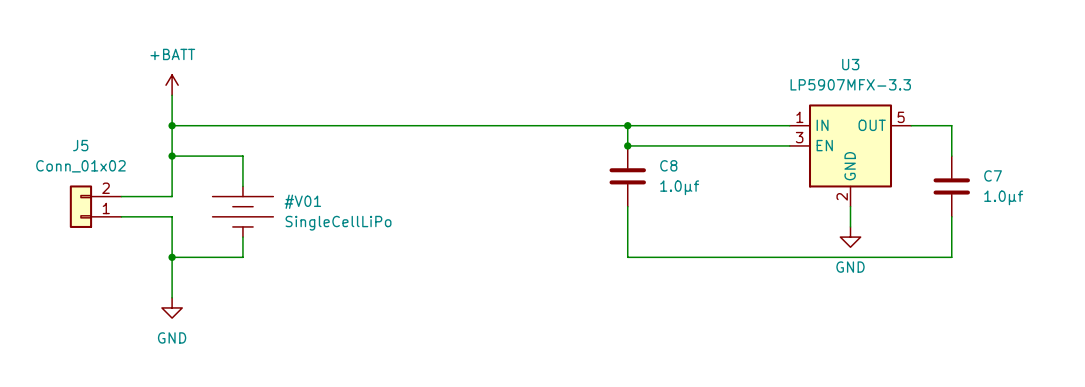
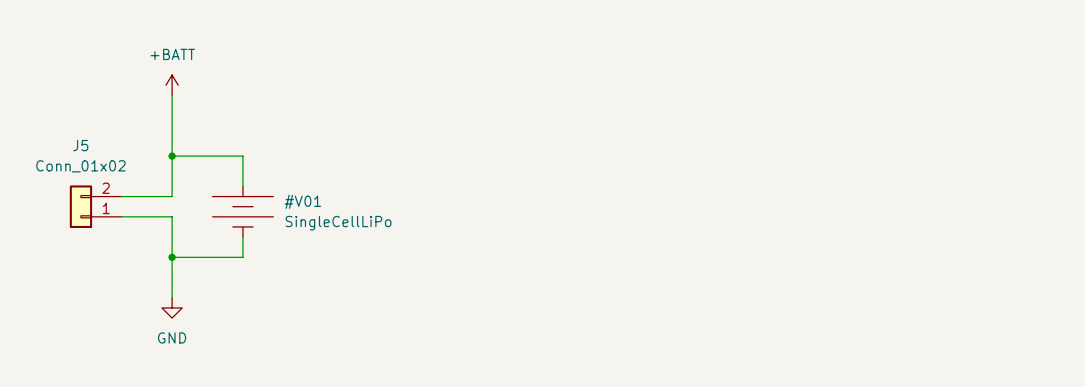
wire: (172, 125) (789, 125) -> none
junction: (172, 125) -> none
wire: (627, 125) (627, 145) (789, 145) -> none
junction: (627, 125) -> none
wire: (911, 125) (951, 125) (951, 156) -> none
junction: (627, 145) -> none
U3: LP5907MFX-3.3 (850, 155) -> none
C8: 1.0µf (627, 176) -> none
C7: 1.0µf (951, 186) -> none
wire: (627, 206) (627, 257) (951, 257) (951, 216) -> none
wire: (850, 206) (850, 226) -> none
power symbol: GND (850, 237) -> none

